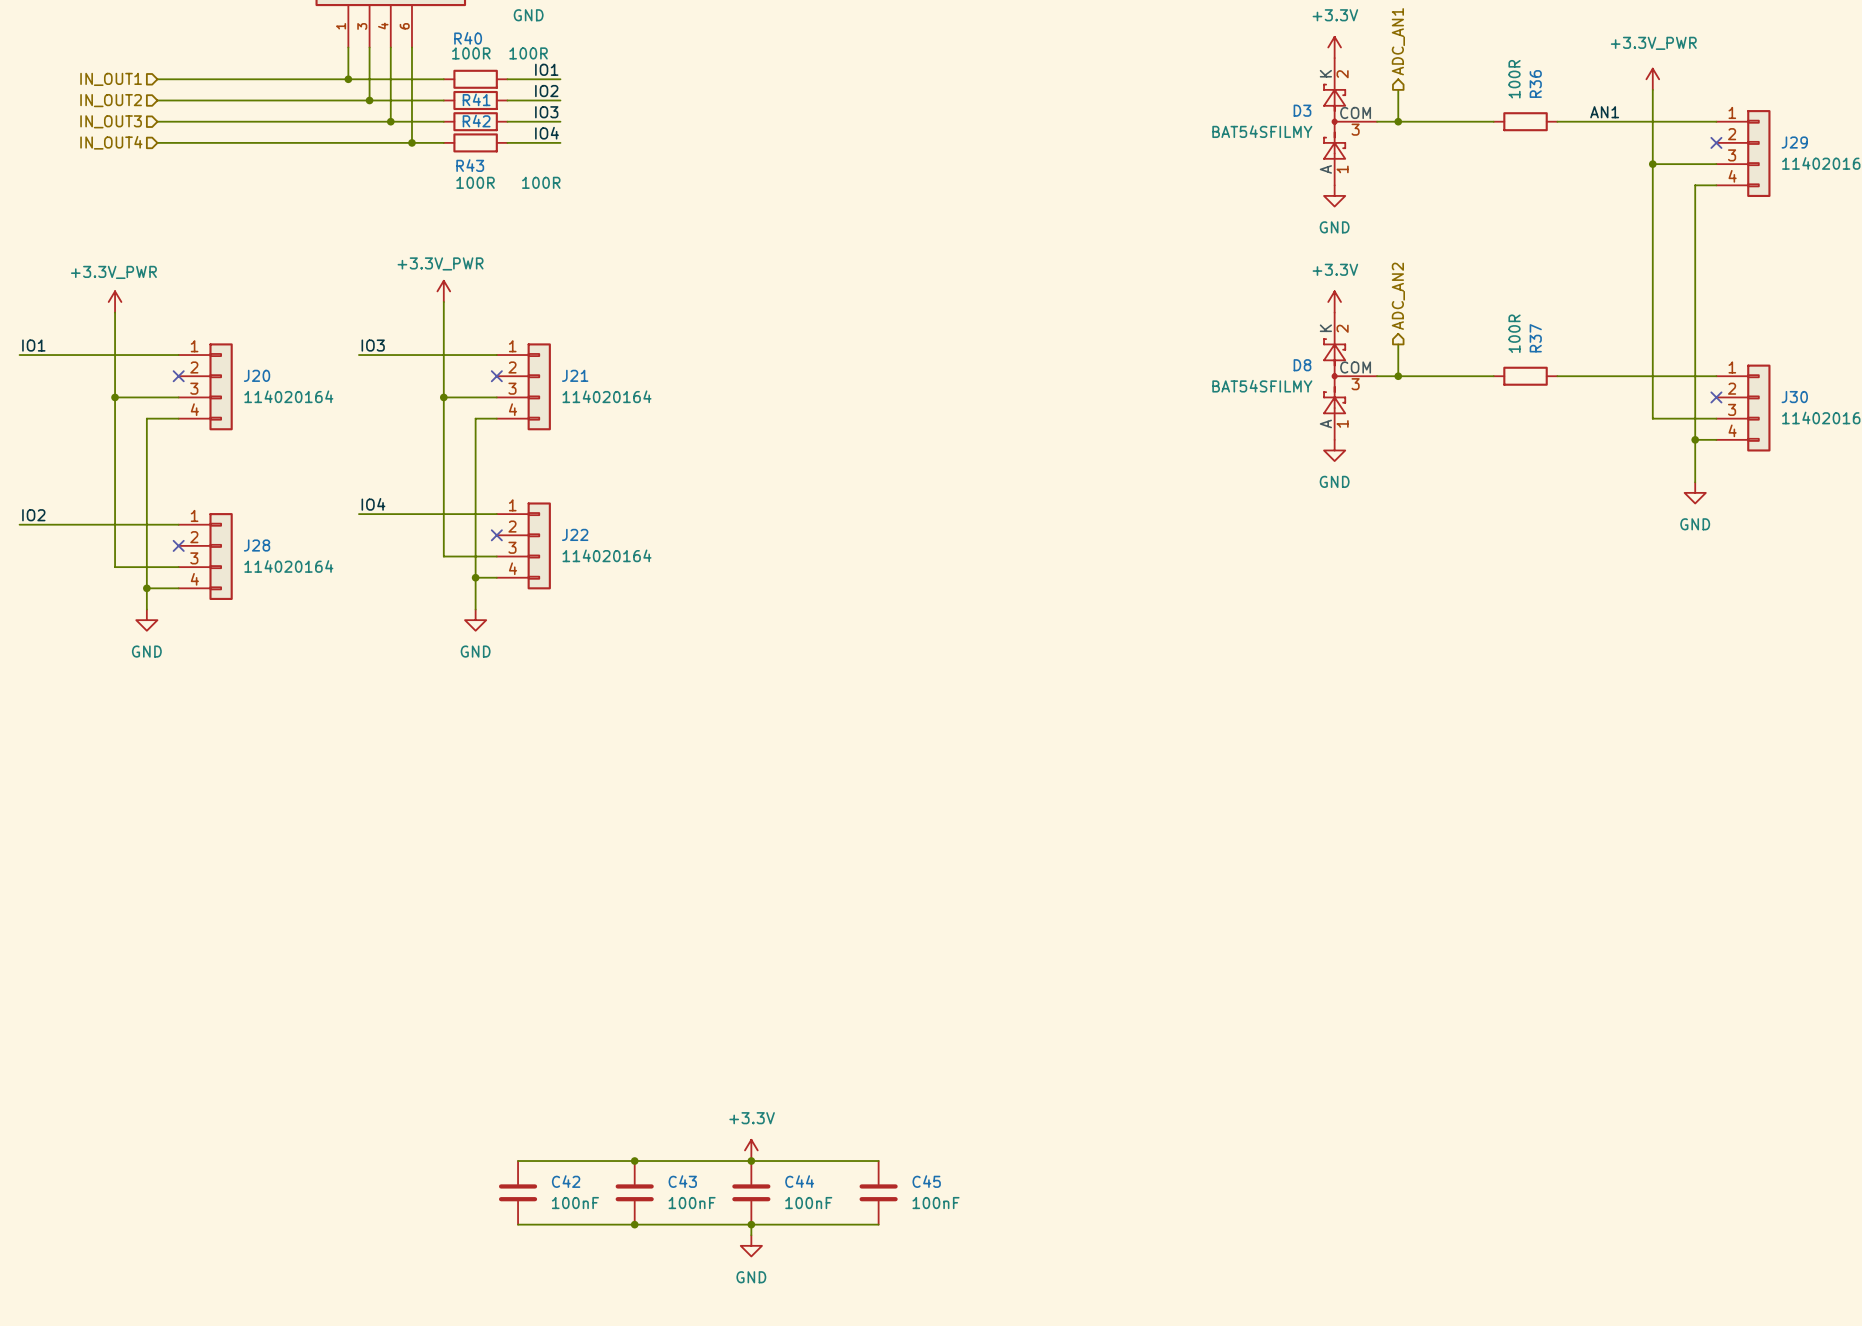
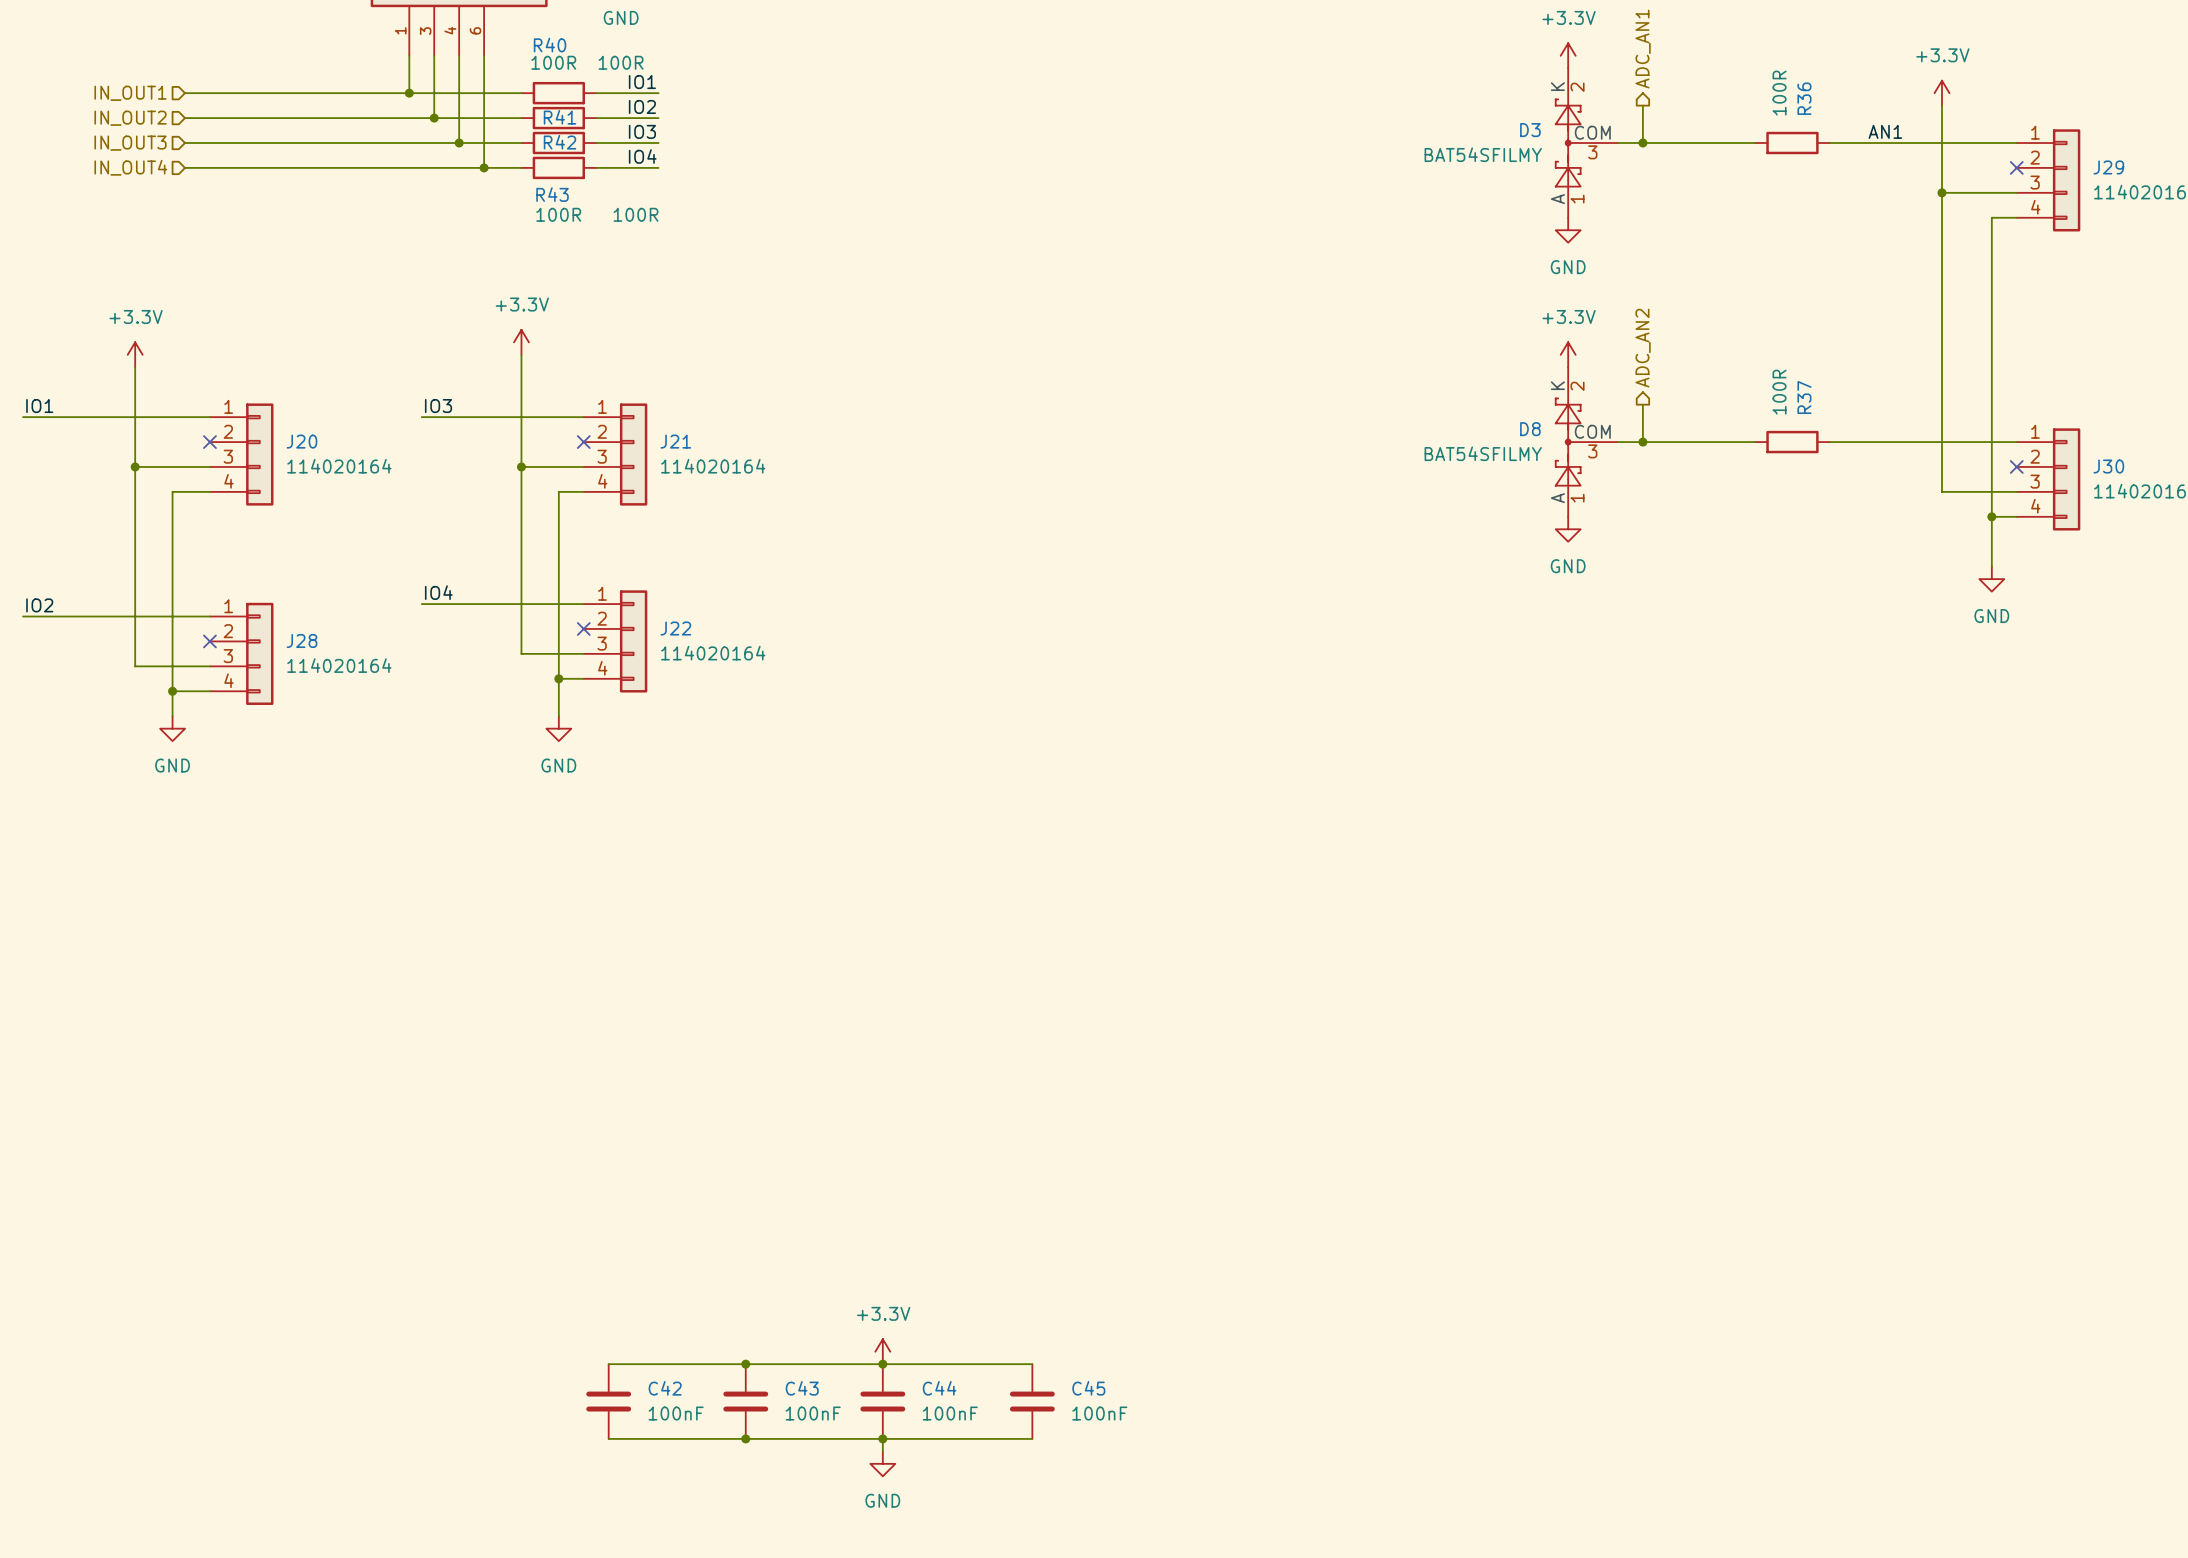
power symbol: +3.3V_PWR (1652, 79) -> +3.3V (1941, 93)
power symbol: +3.3V_PWR (443, 291) -> +3.3V (521, 342)
power symbol: +3.3V_PWR (115, 301) -> +3.3V (135, 354)

